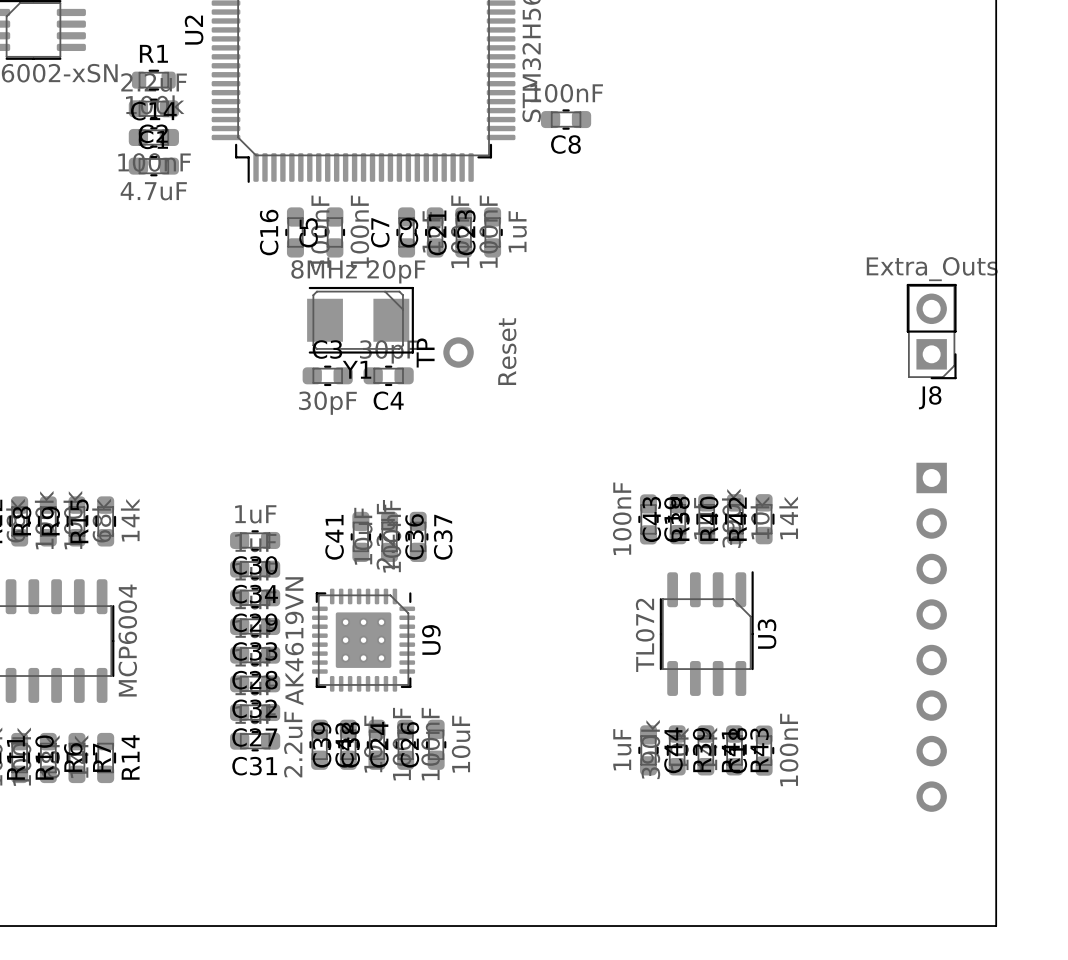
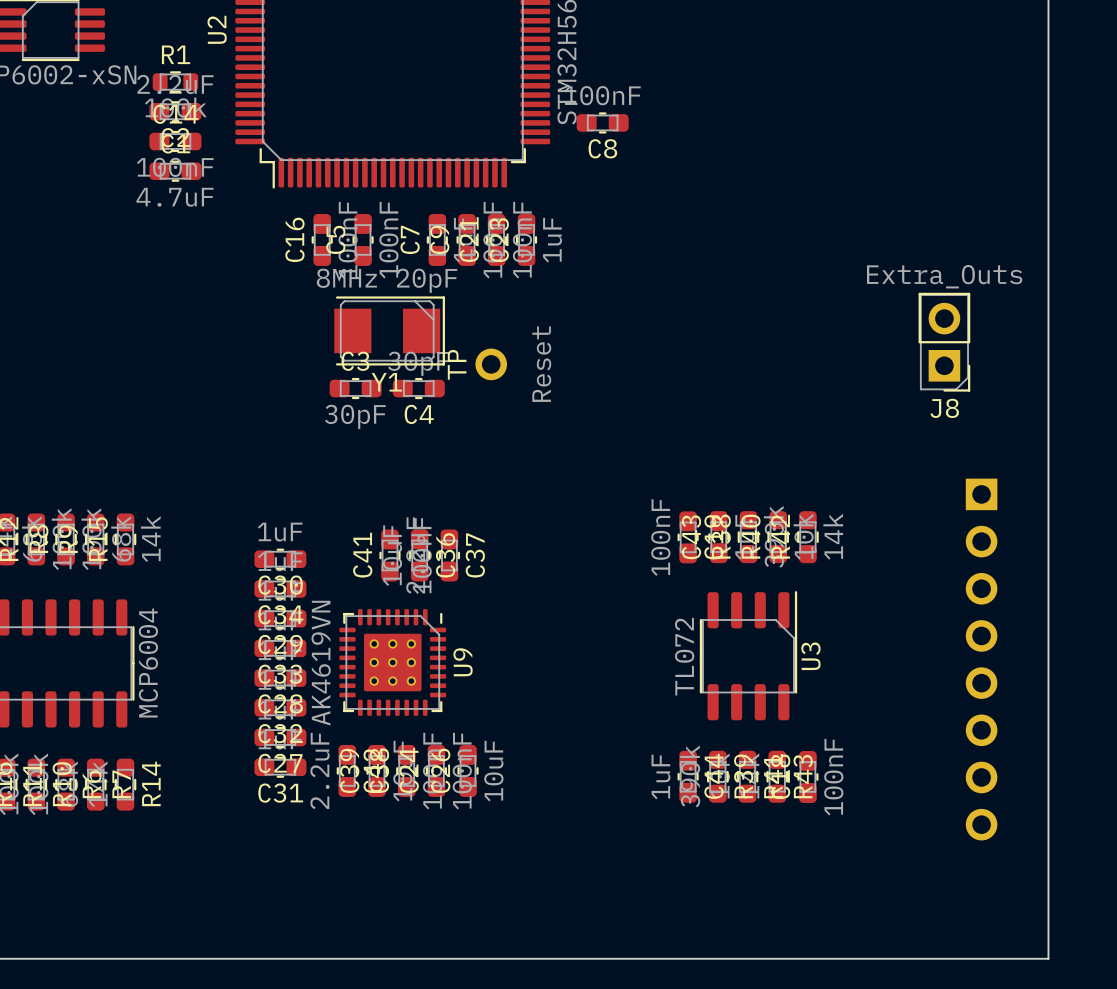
J8 position: (931, 331) -> (944, 342)

